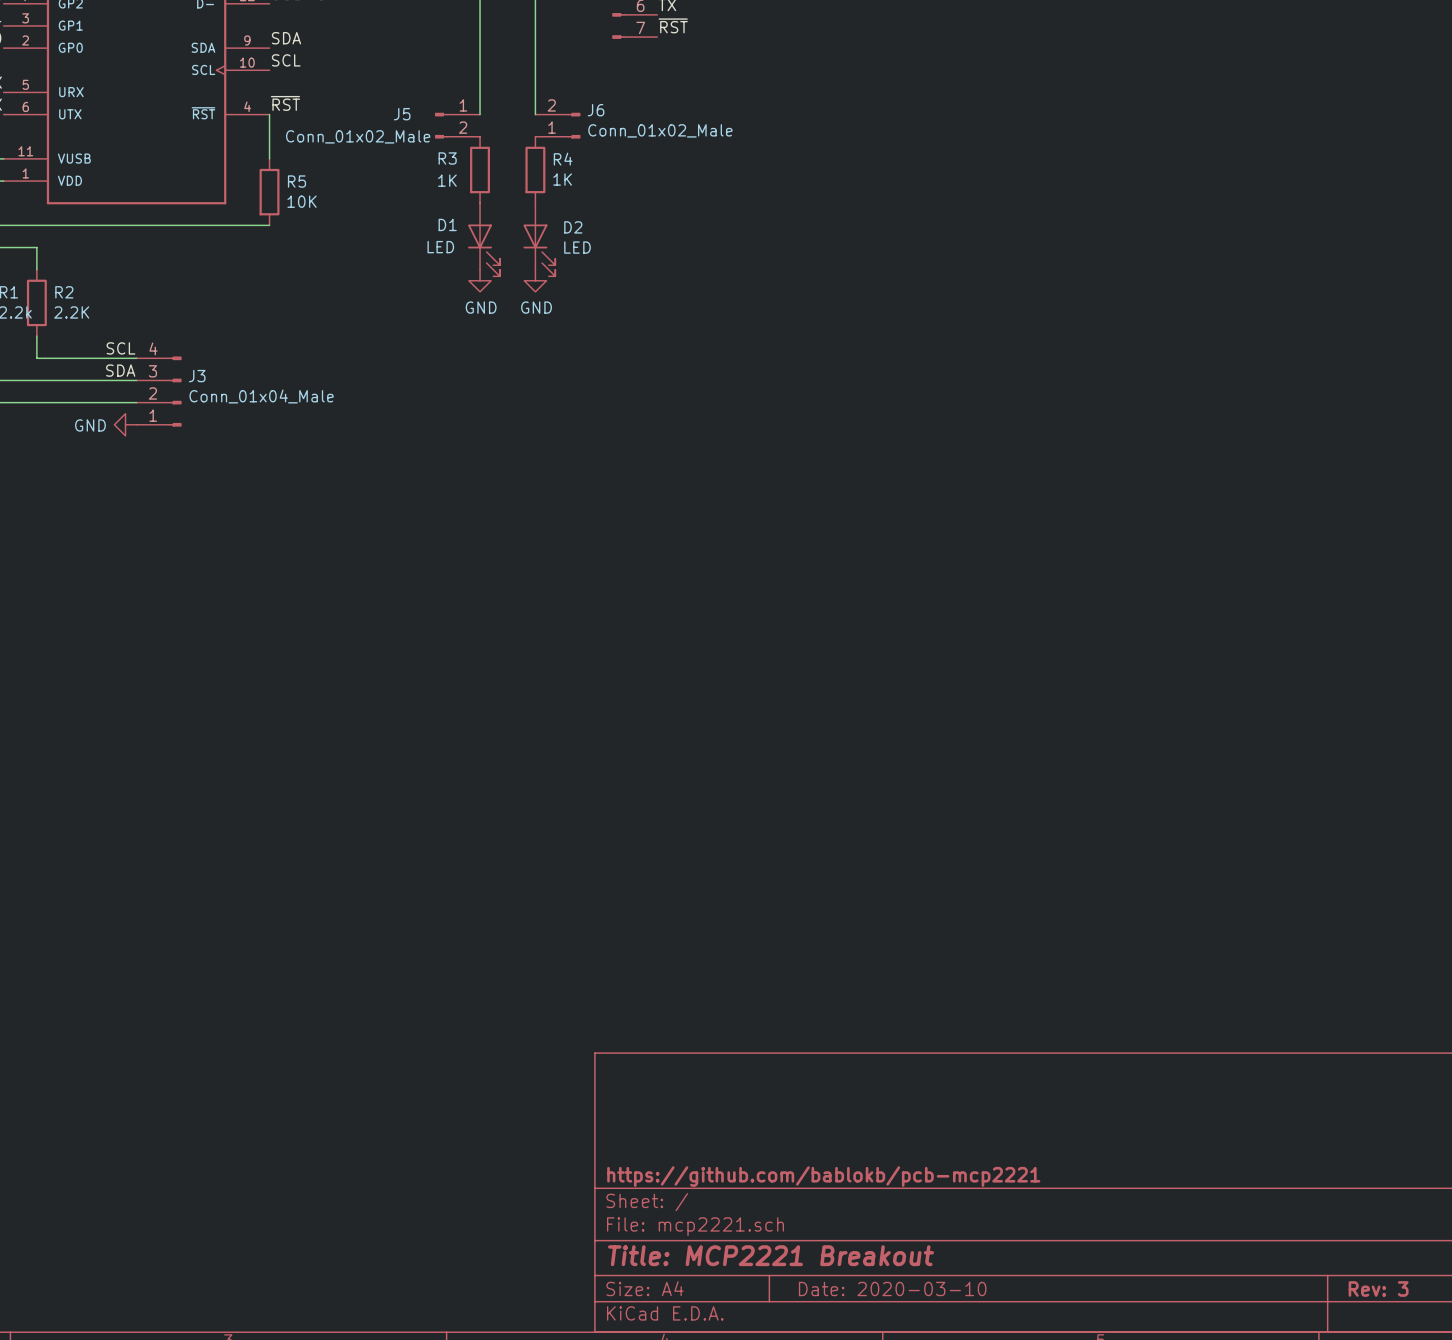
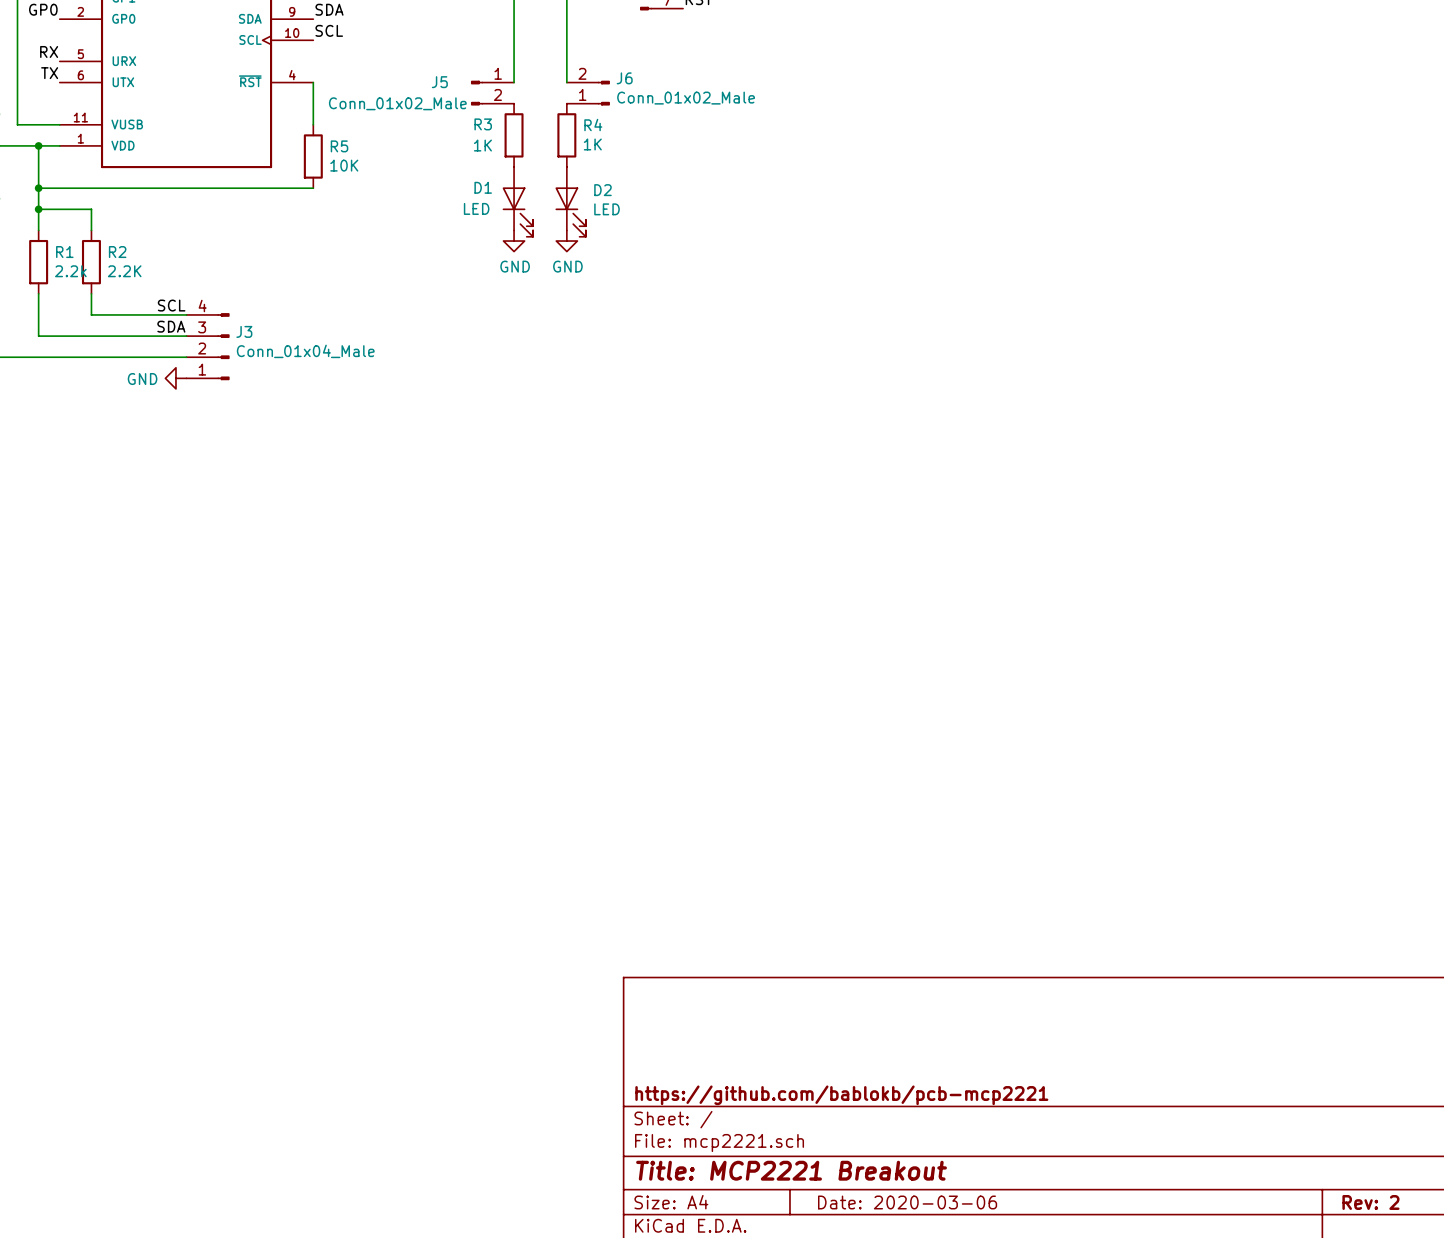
label: ~{RST} (285, 103) -> none
title block: Date: 2020-03-10 (892, 1289) -> Date: 2020-03-06 (907, 1202)
title block: Rev: 3 (1378, 1289) -> Rev: 2 (1370, 1202)

